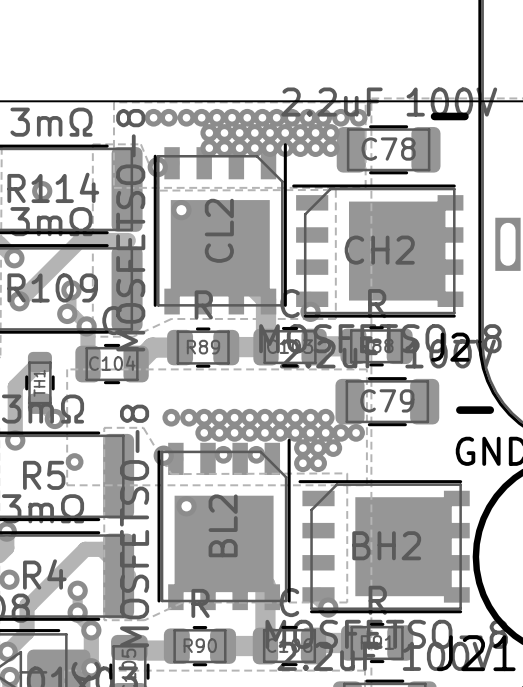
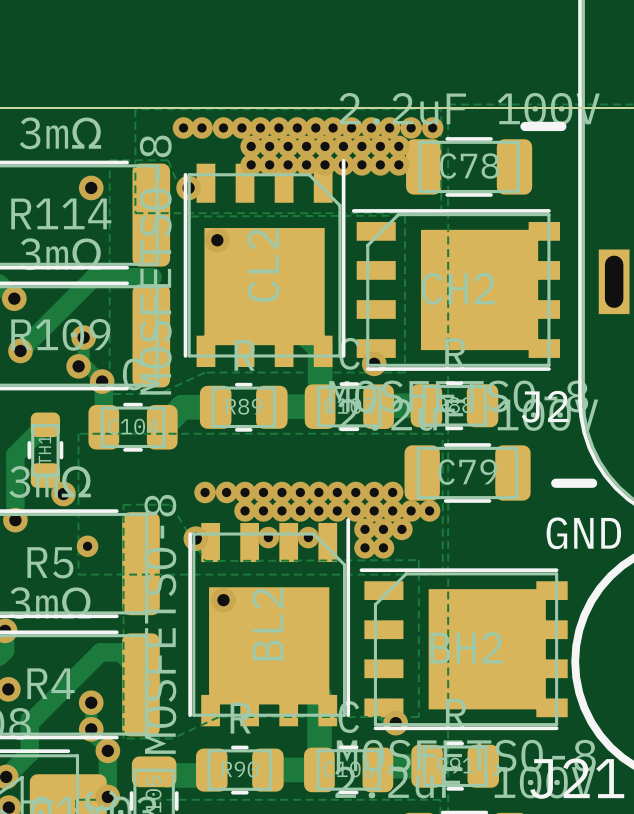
via position: (42, 191) -> (91, 187)

